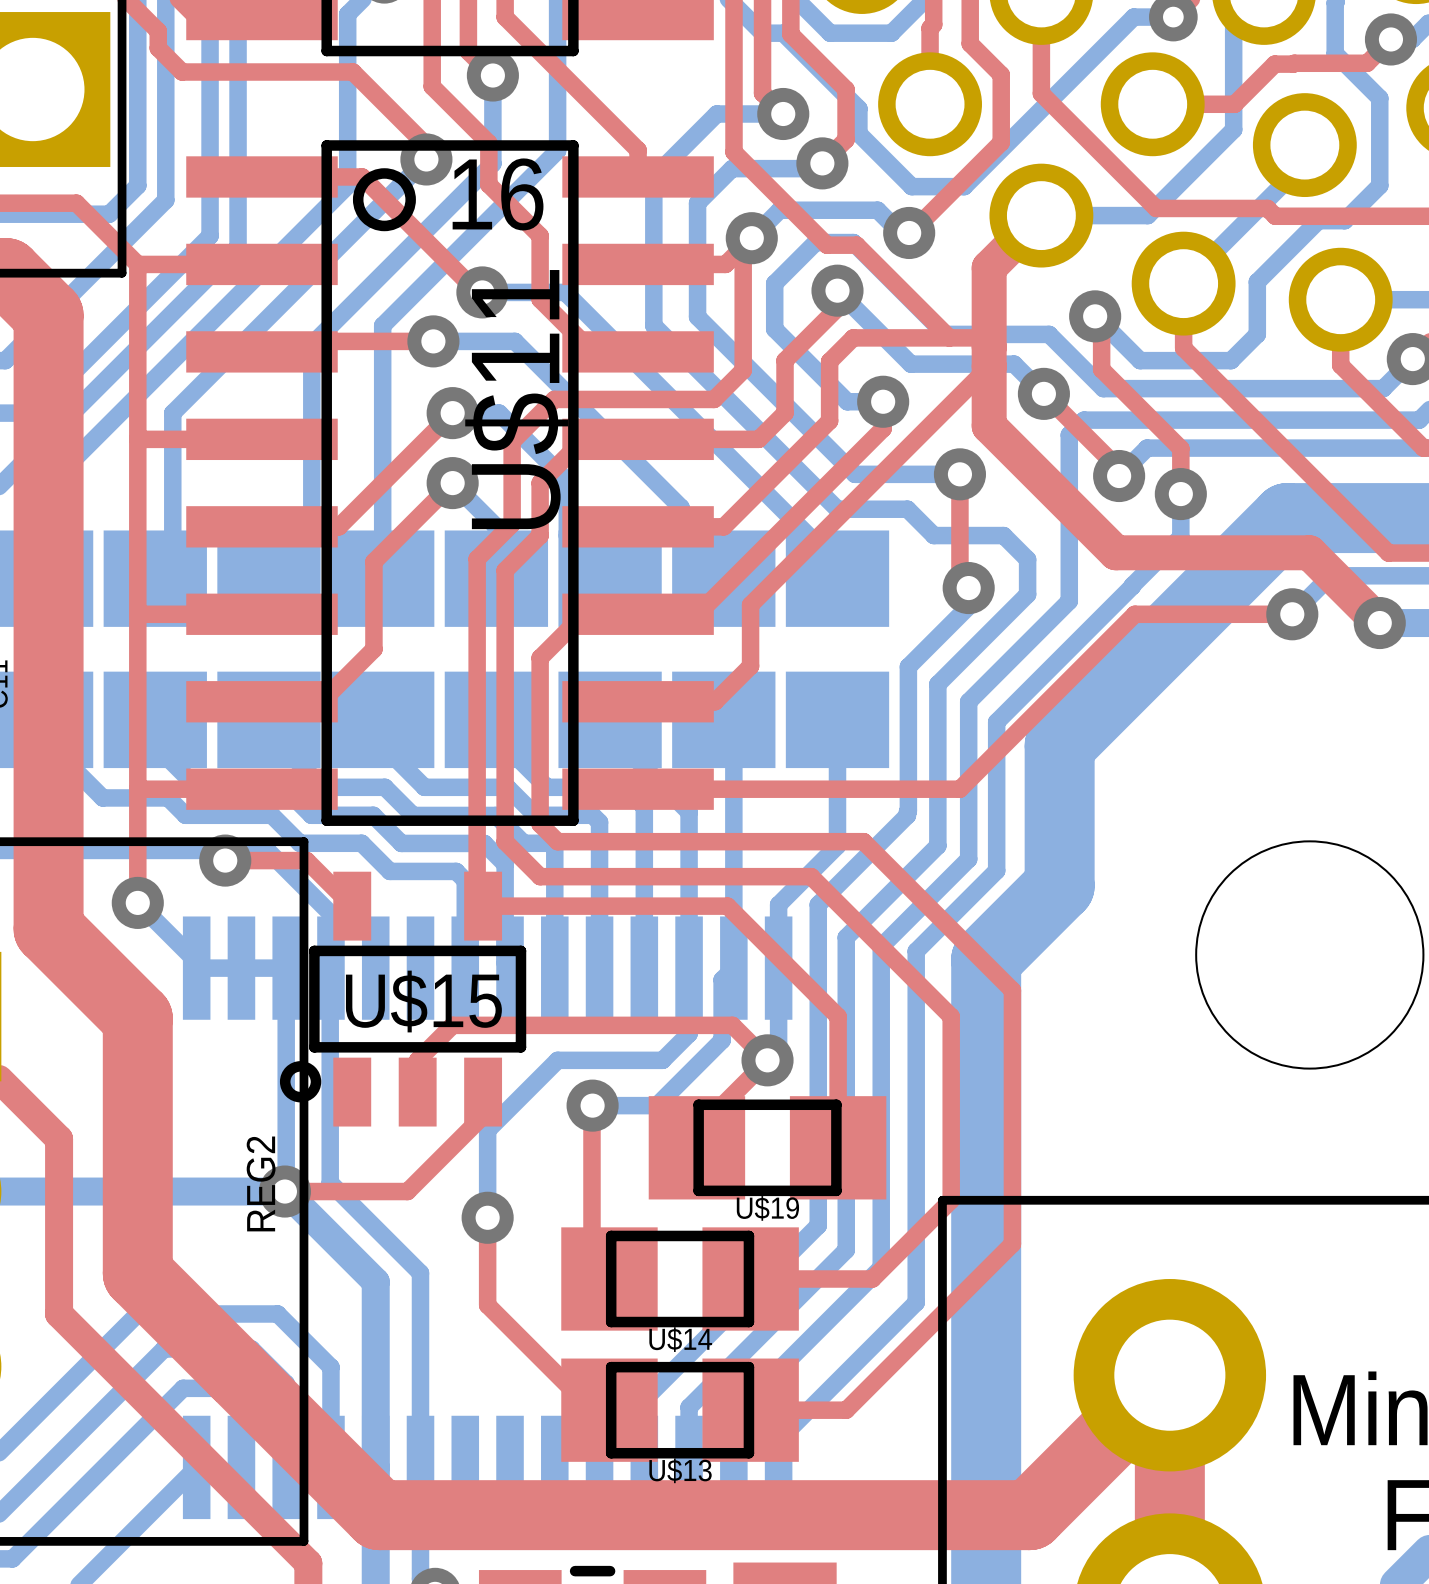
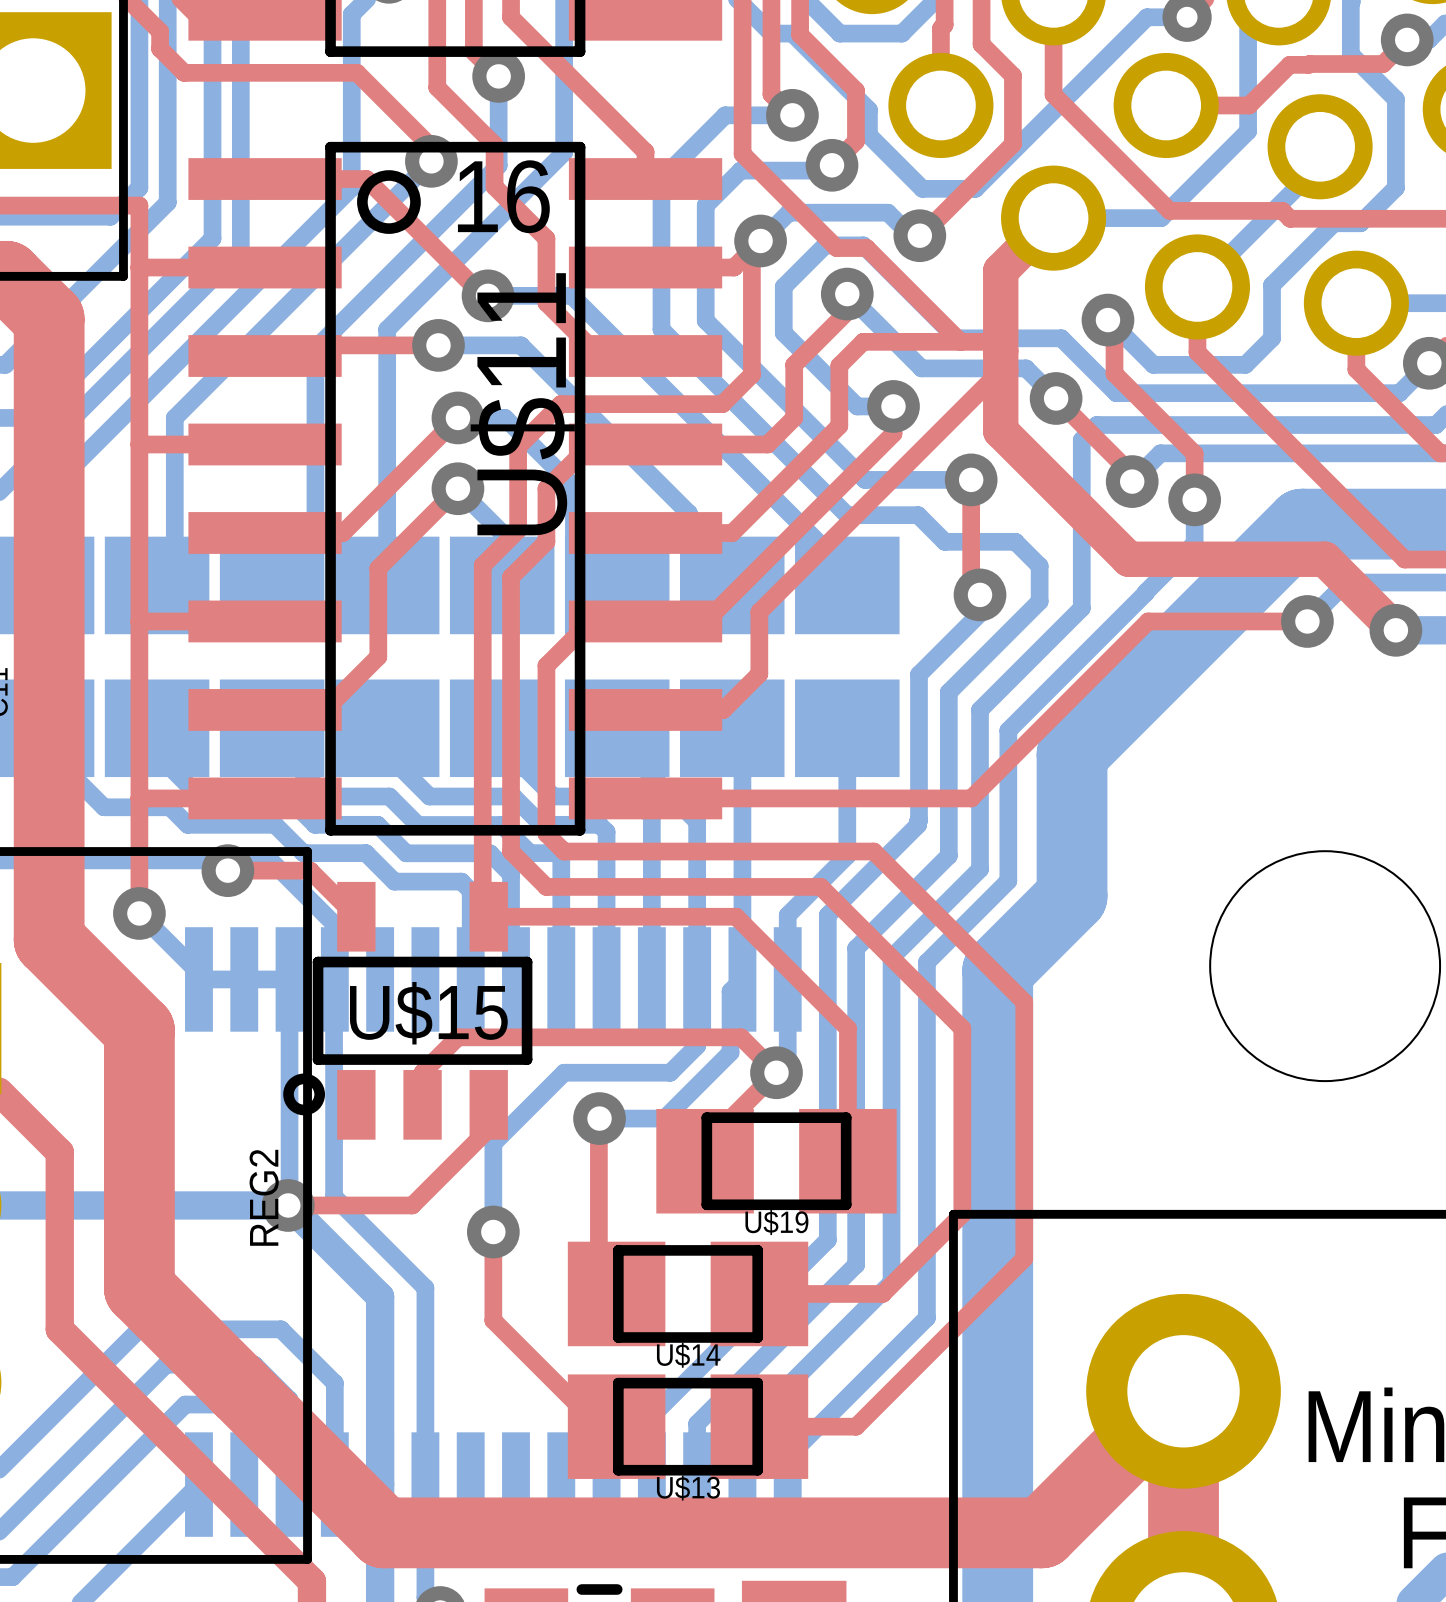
top track: (76, 203) (137, 264) -> (77, 205) (139, 205) (139, 267)

